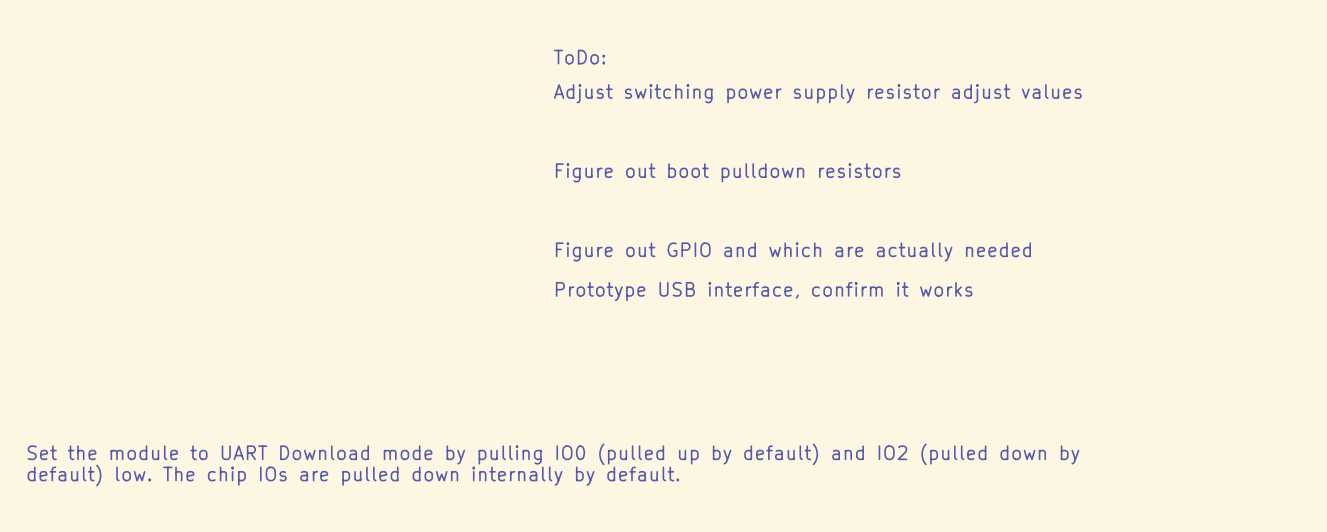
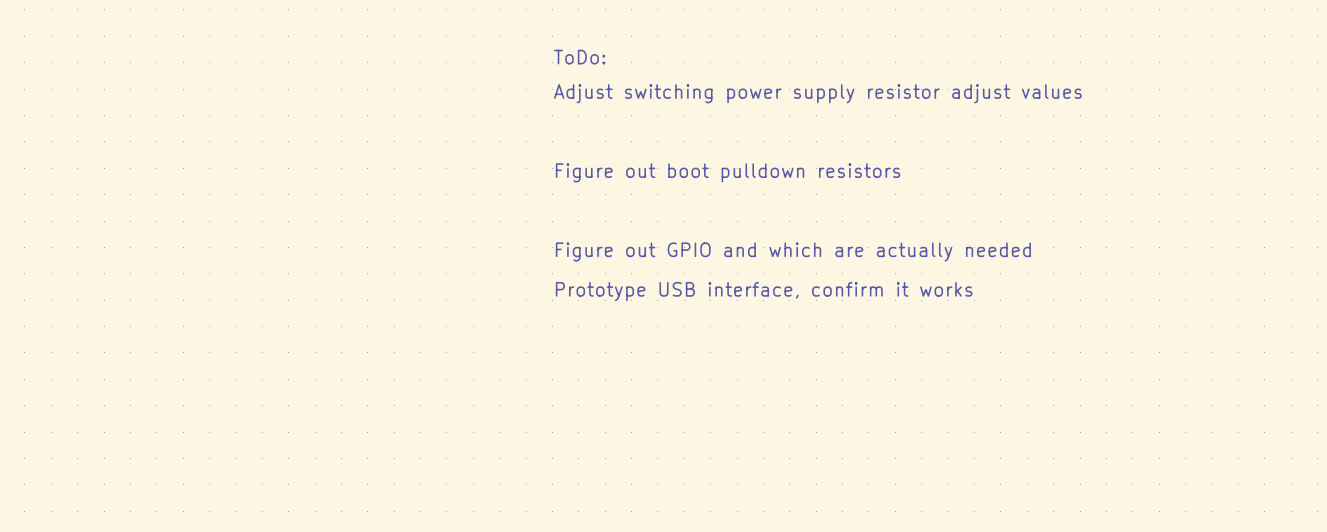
text: Set the module to UART Download mode by pulling IO0 (pulled up by default) and IO2 (pulled down by (553, 454) -> none
text: default) low. The chip IOs are pulled down internally by default. (353, 475) -> none

